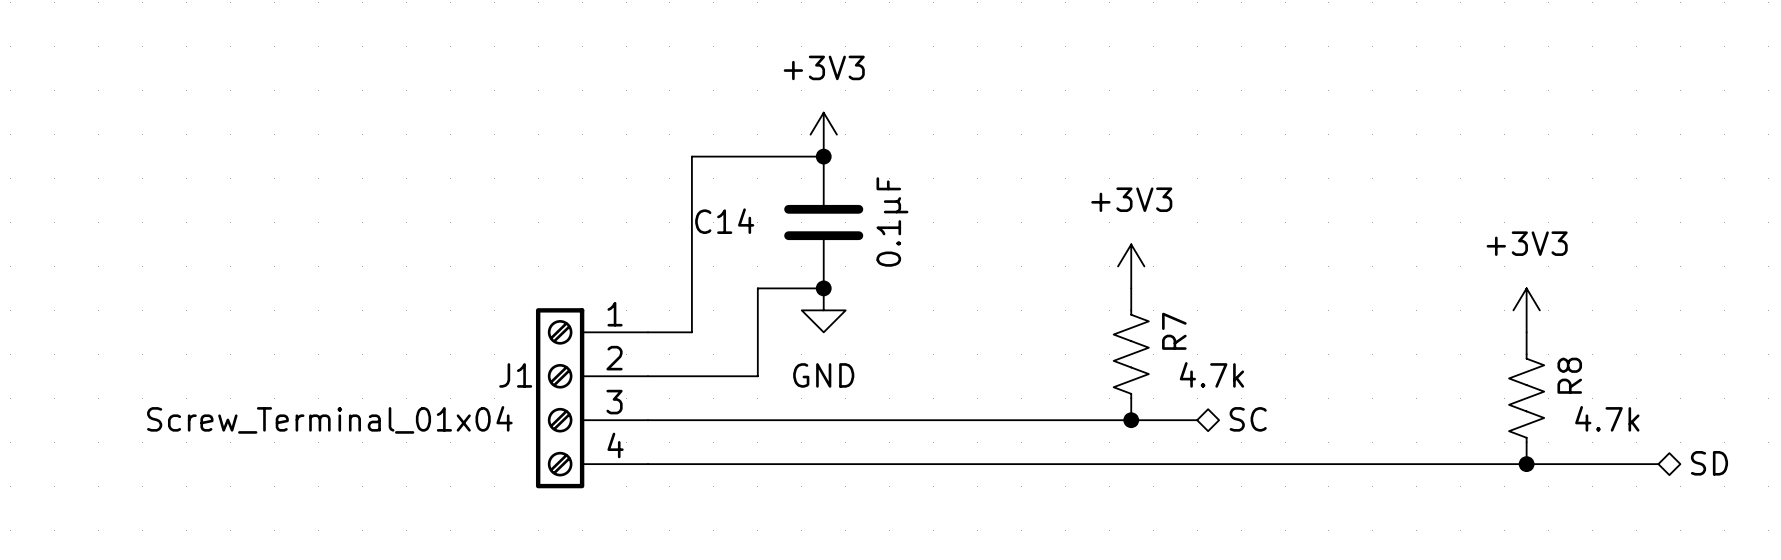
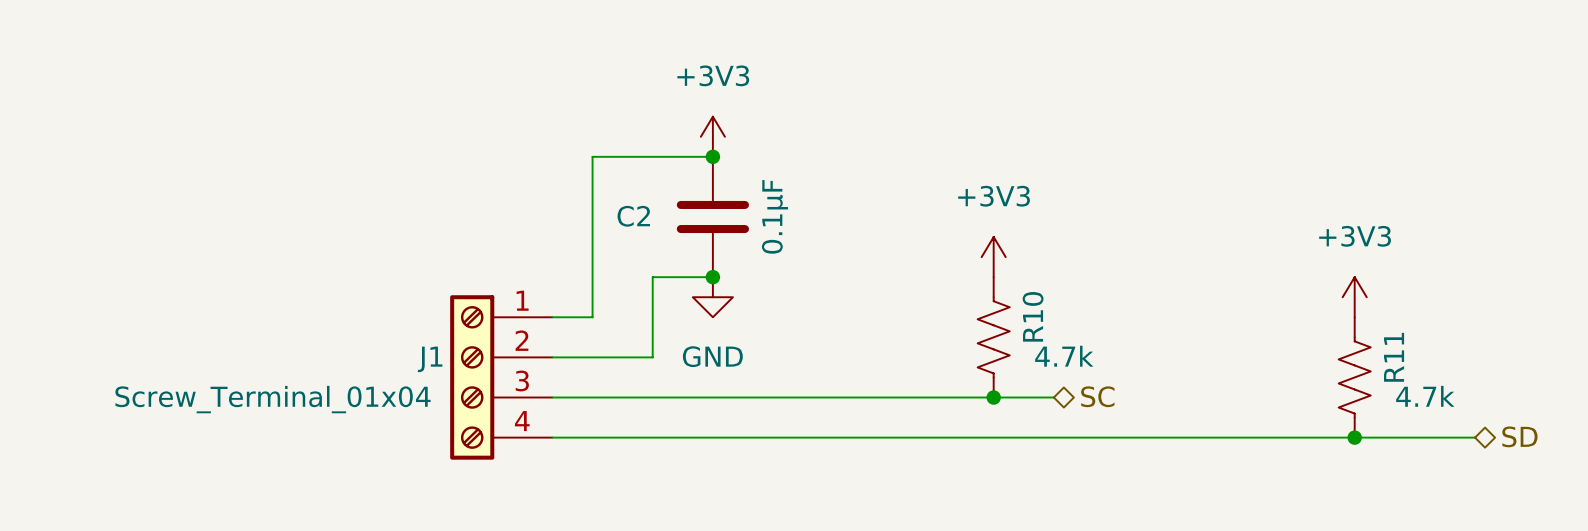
C14 name: C14 (724, 221) -> C2 (633, 216)
R7 name: R7 (1174, 331) -> R10 (1033, 316)
R8 name: R8 (1569, 375) -> R11 (1394, 357)

